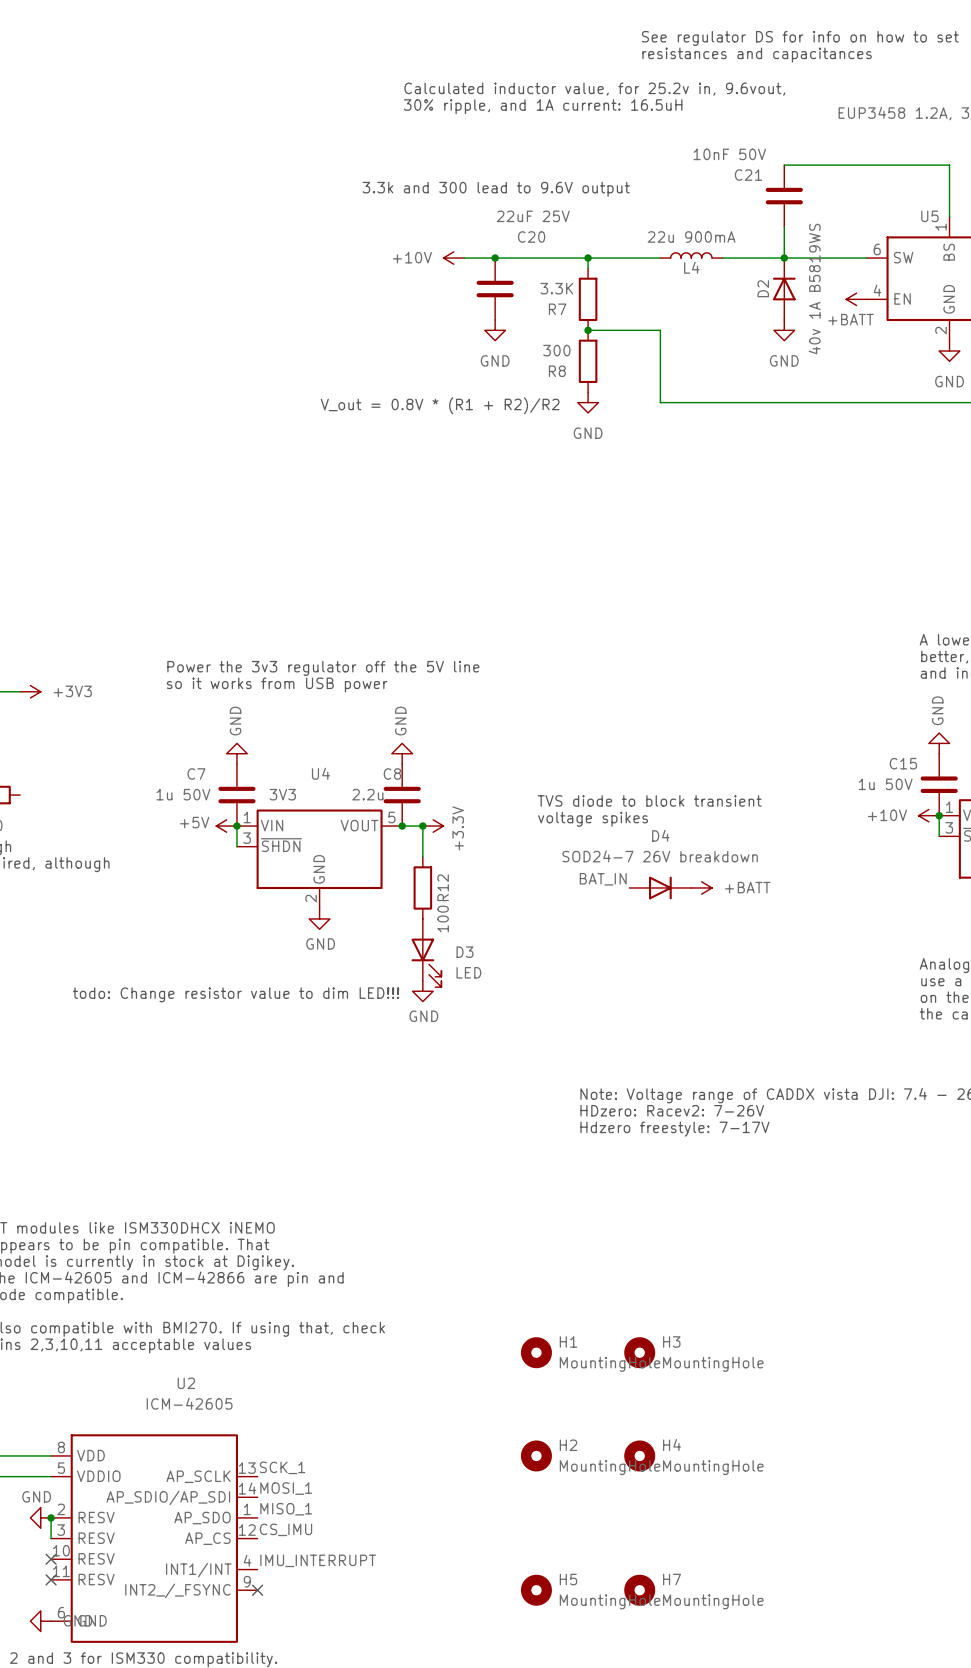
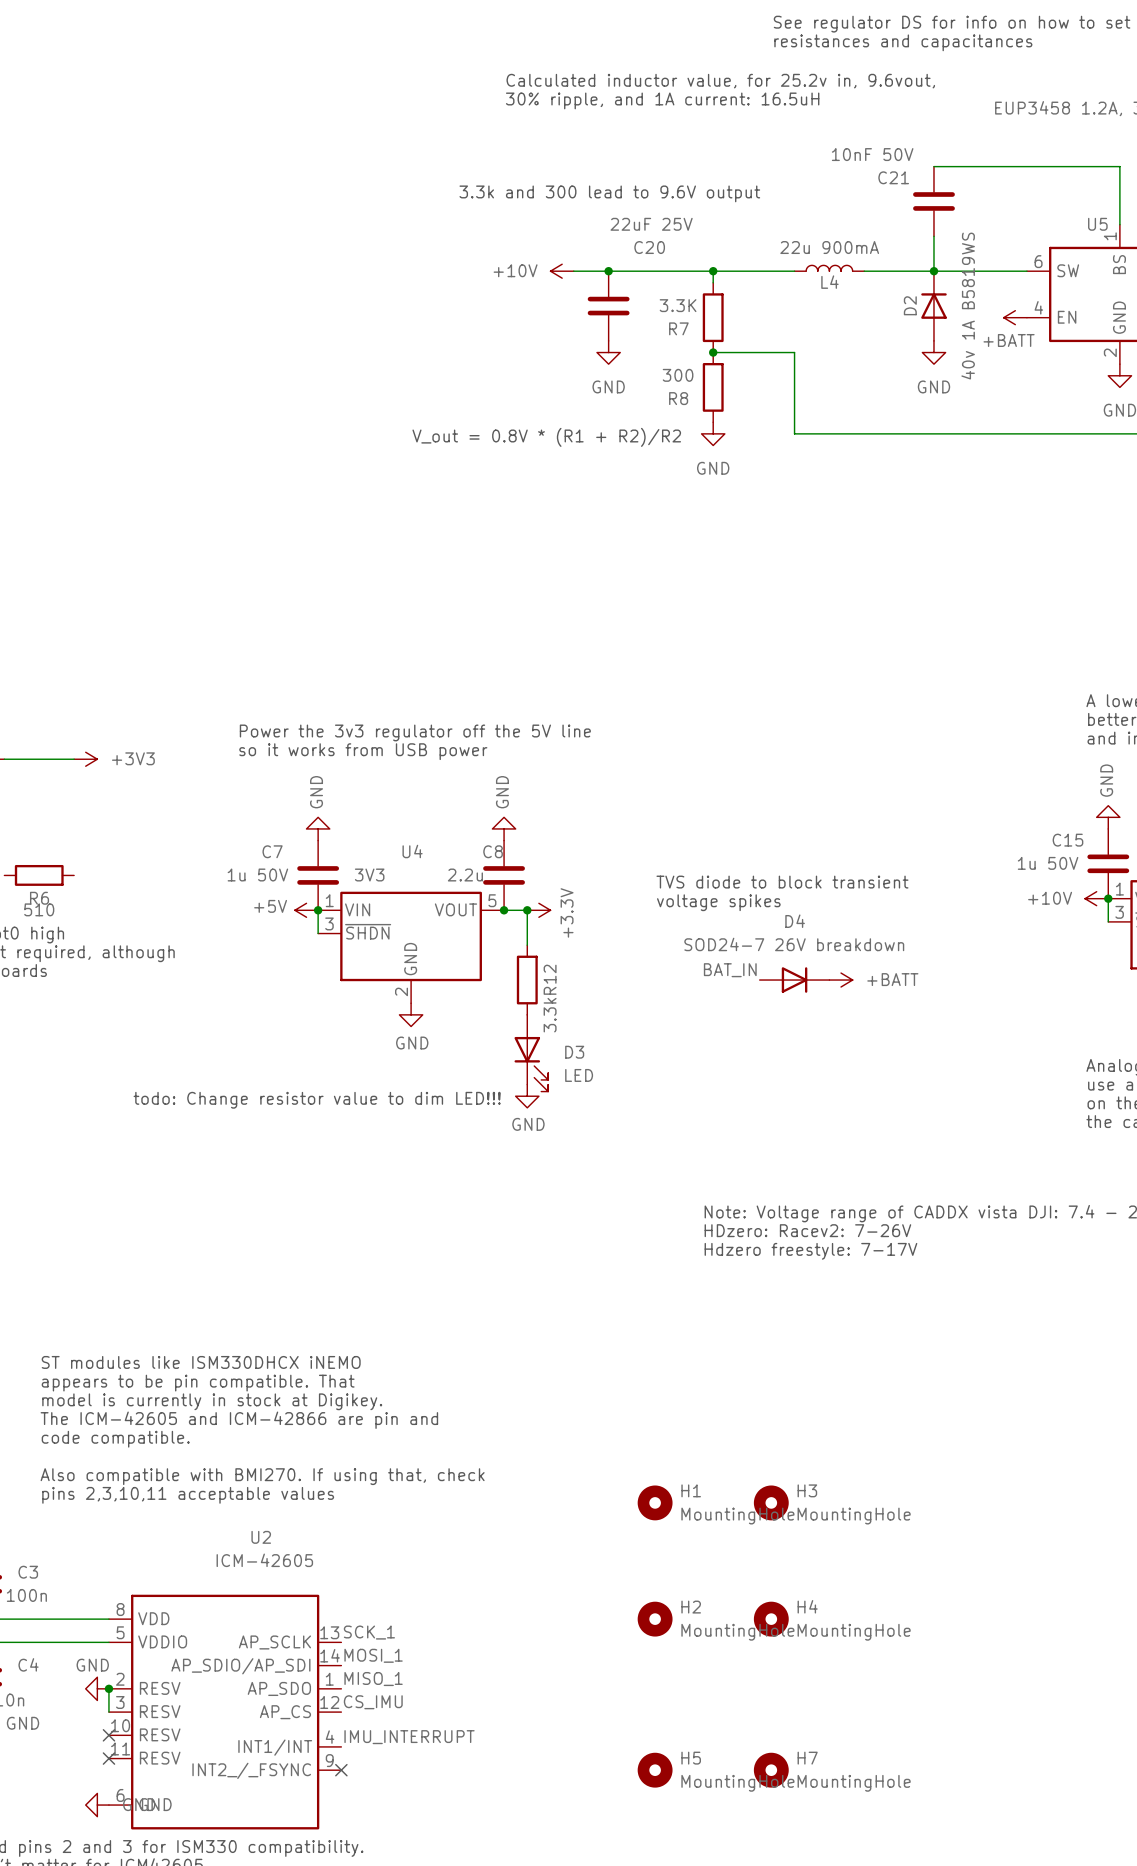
R12 value: 100 (443, 918) -> 3.3k (550, 1015)

